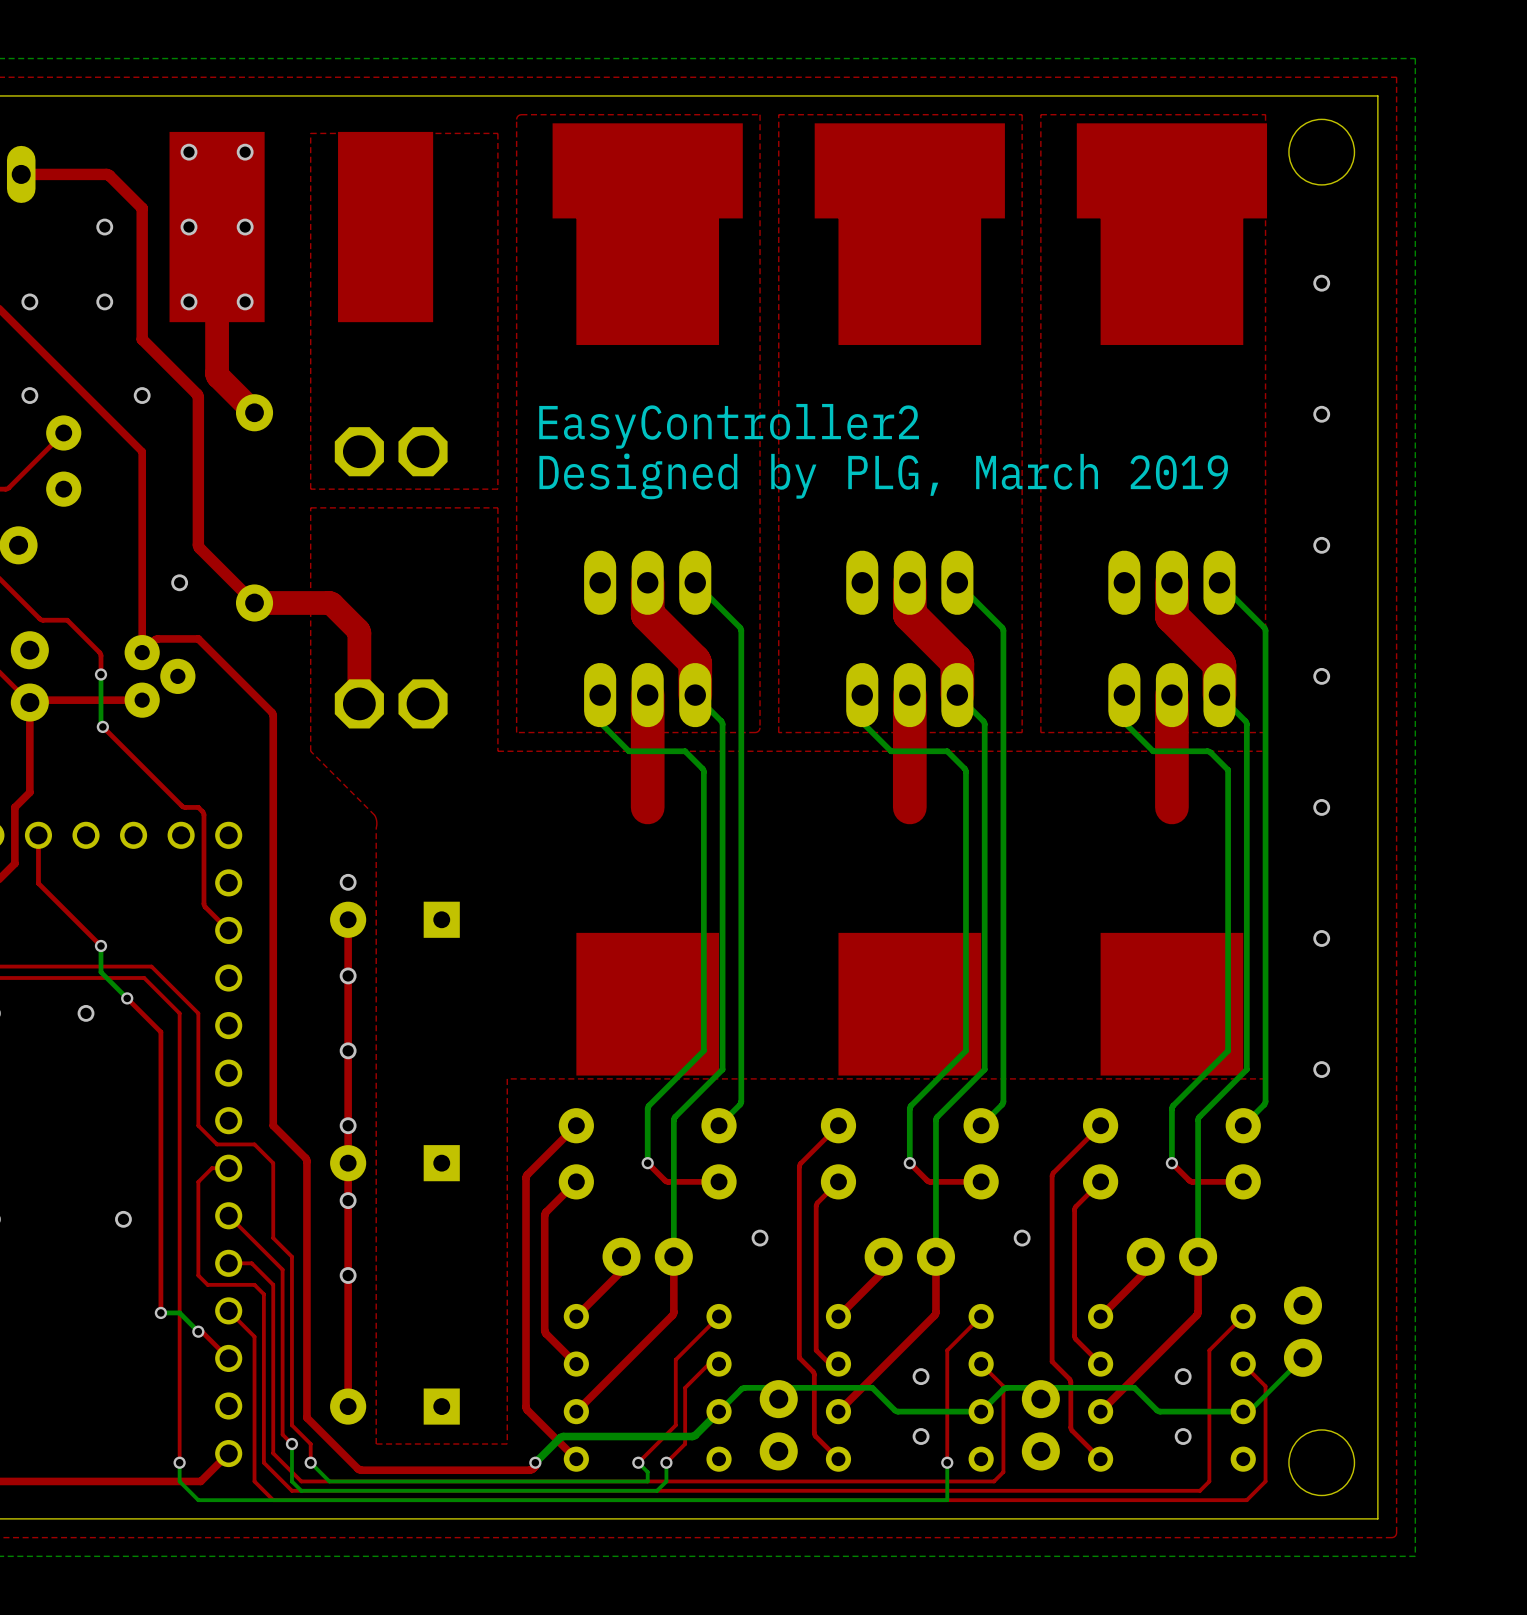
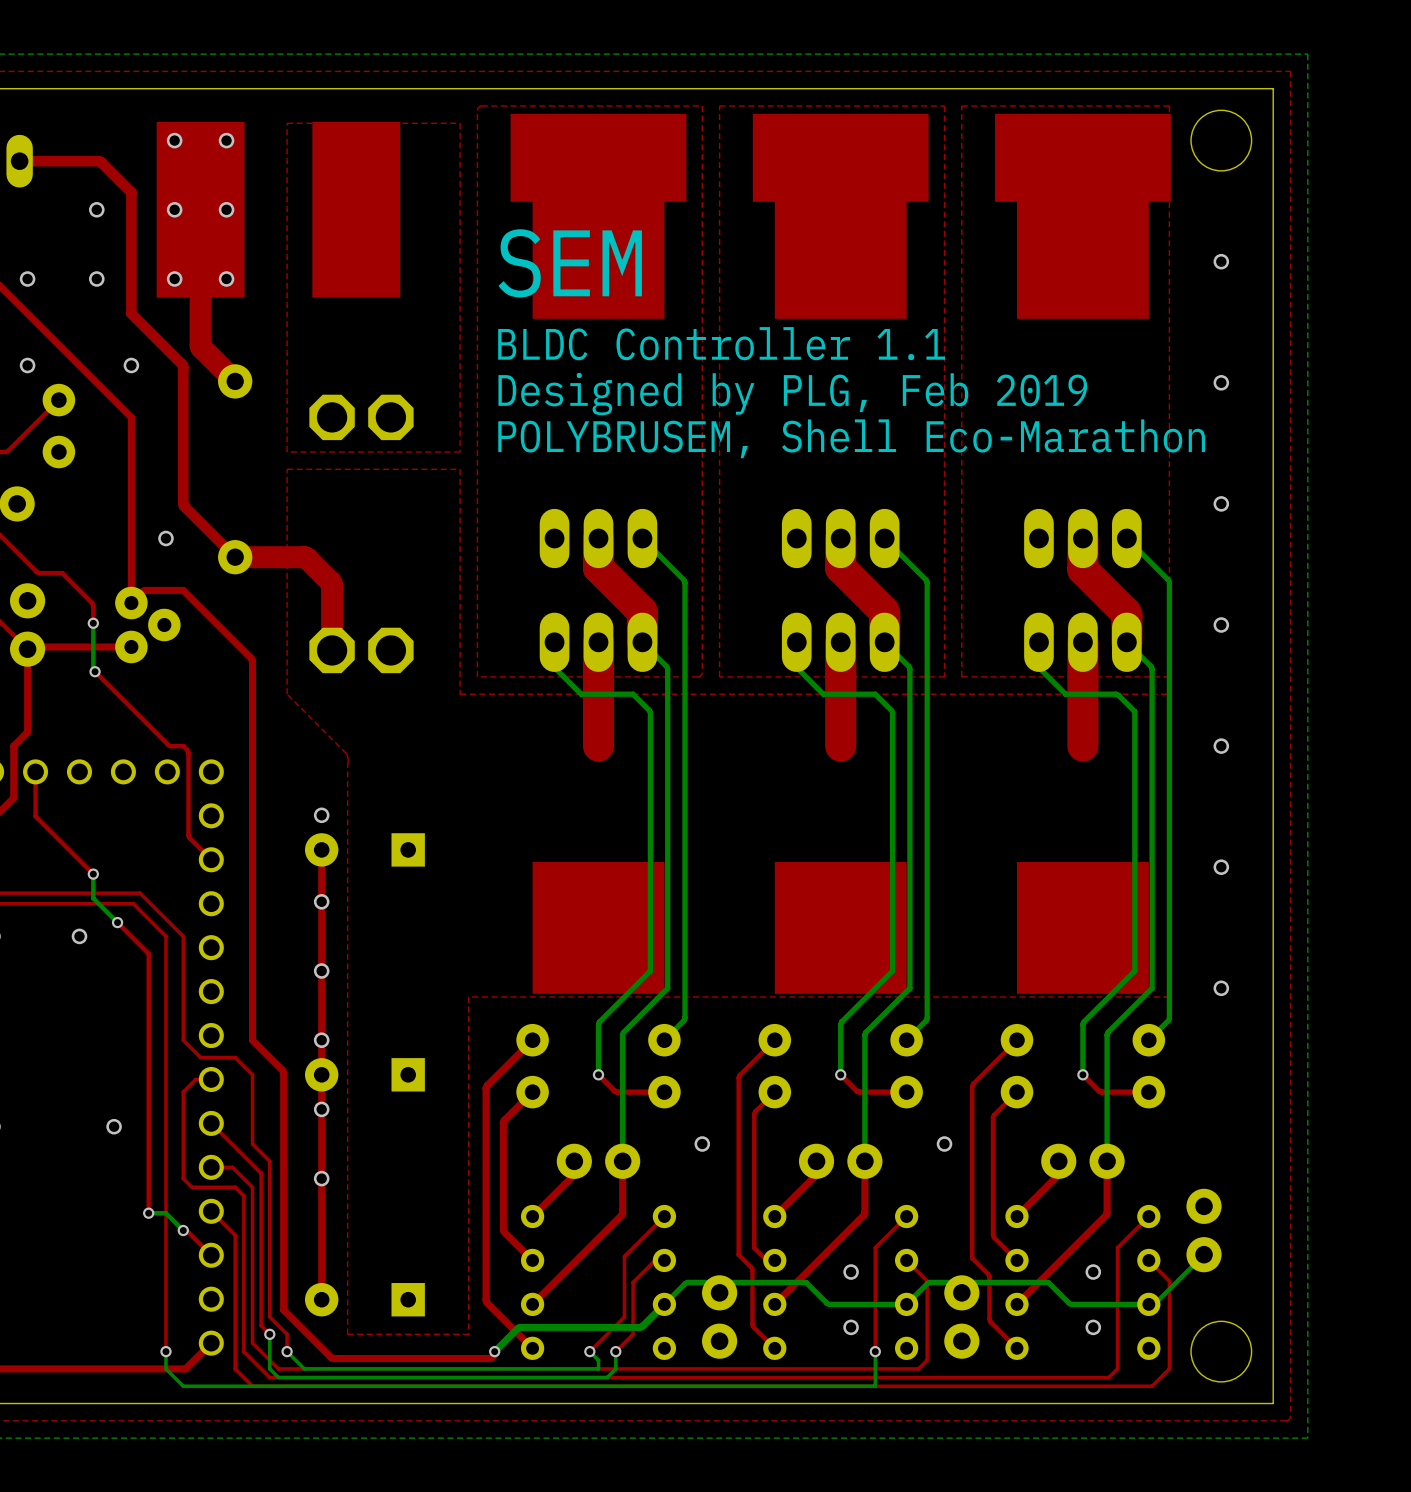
text: none -> SEM (570, 263)
text: none -> BLDC Controller 1.1 (721, 343)
text: EasyController2 (729, 426) -> Designed by PLG, Feb 2019 (792, 394)
text: Designed by PLG, March 2019 (883, 476) -> POLYBRUSEM, Shell Eco-Marathon (851, 438)

